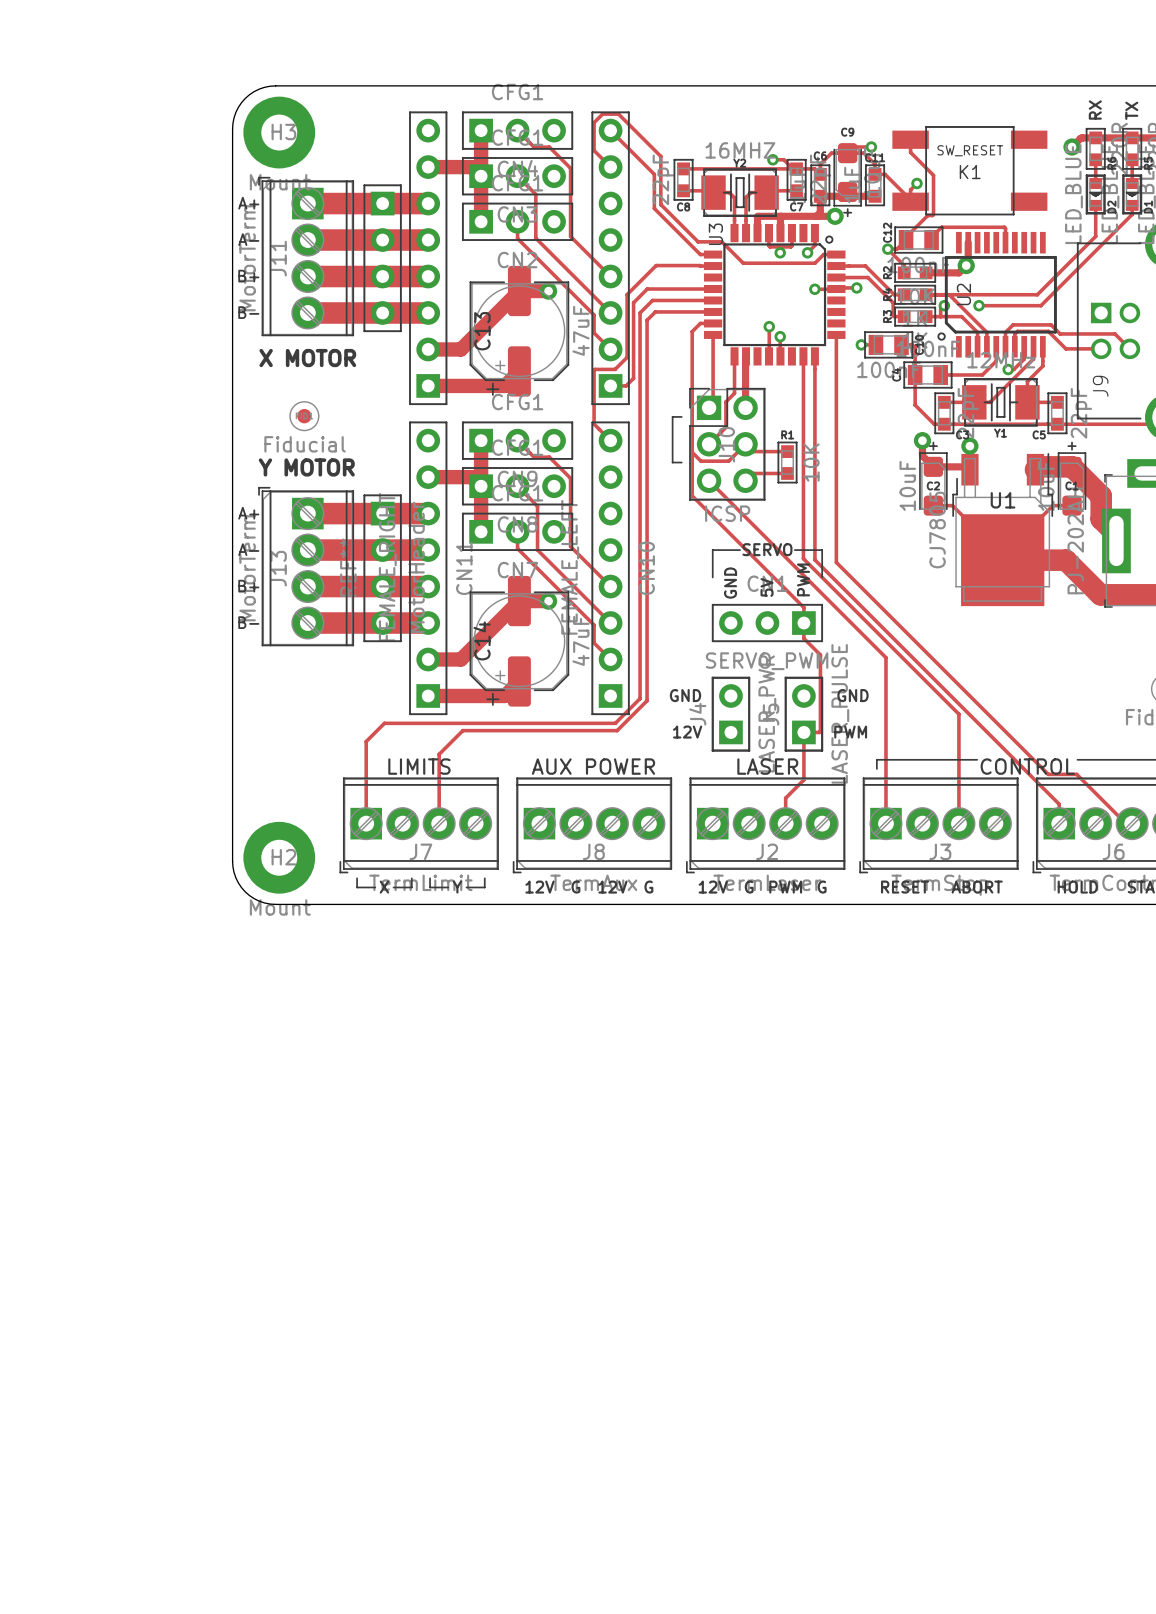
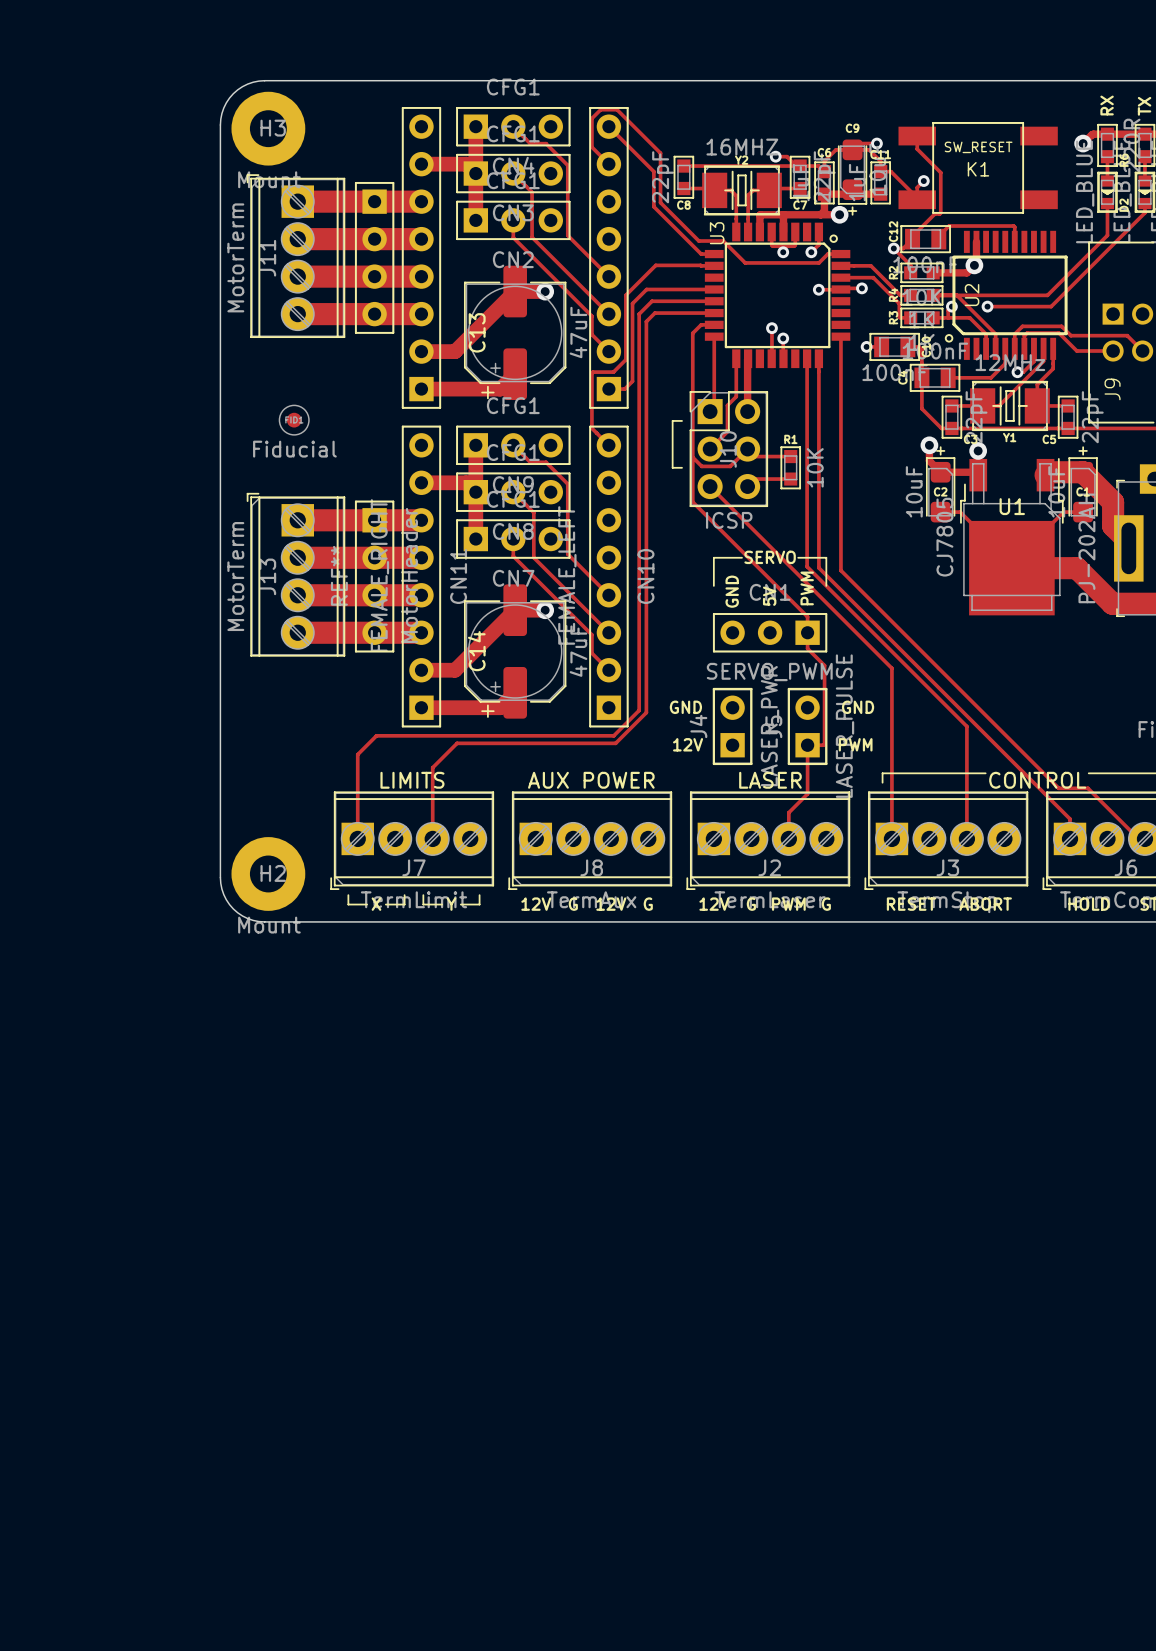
text: A+ (248, 203) -> none
text: A- (248, 239) -> none
text: B+ (248, 276) -> none
text: B- (248, 312) -> none
text: X MOTOR (307, 358) -> none
text: Y MOTOR (306, 467) -> none
text: A+ (248, 513) -> none
text: A- (248, 549) -> none
text: B+ (248, 586) -> none
text: B- (248, 622) -> none

